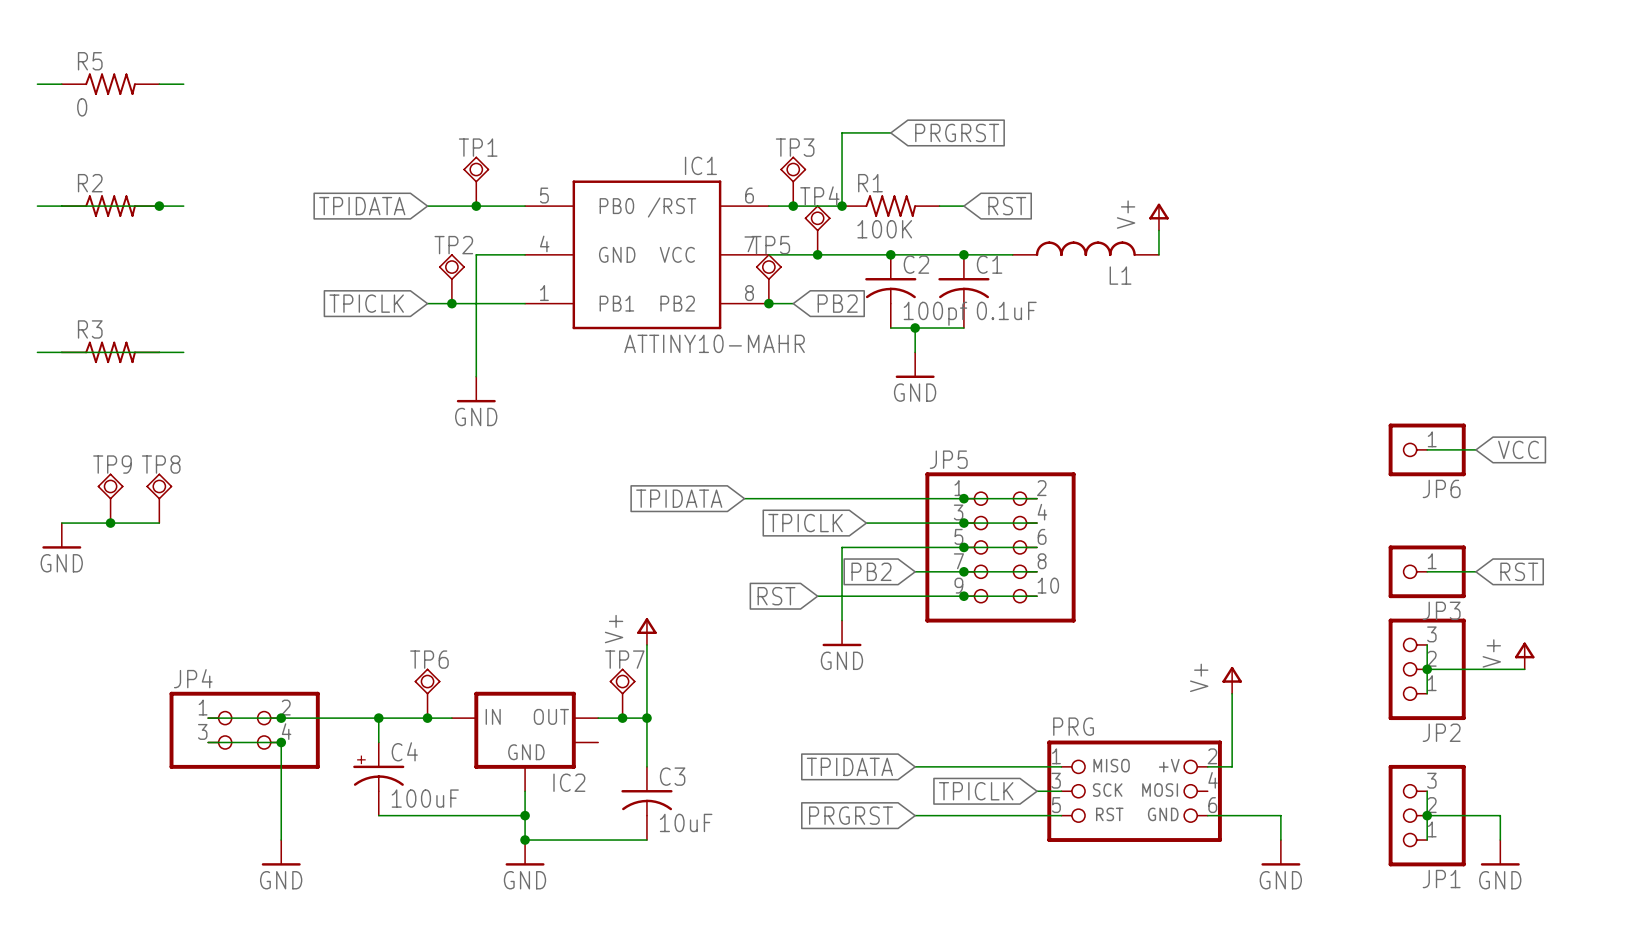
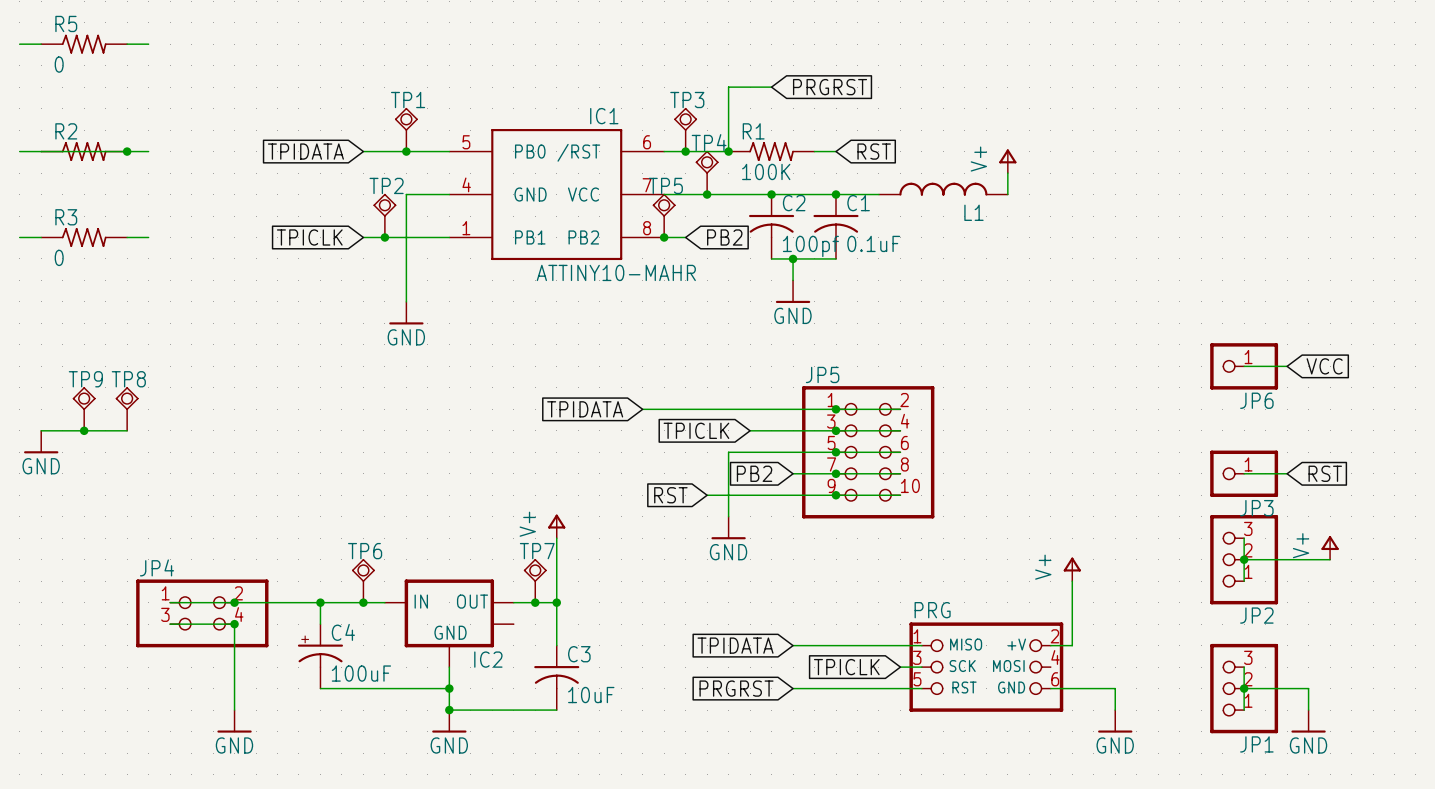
wire: none -> (19, 237) (41, 237)
wire: none -> (127, 237) (148, 237)
R3 value: none -> 0 (59, 257)
wire: (37, 352) (183, 352) -> none
R3 position: (110, 352) -> (84, 237)

